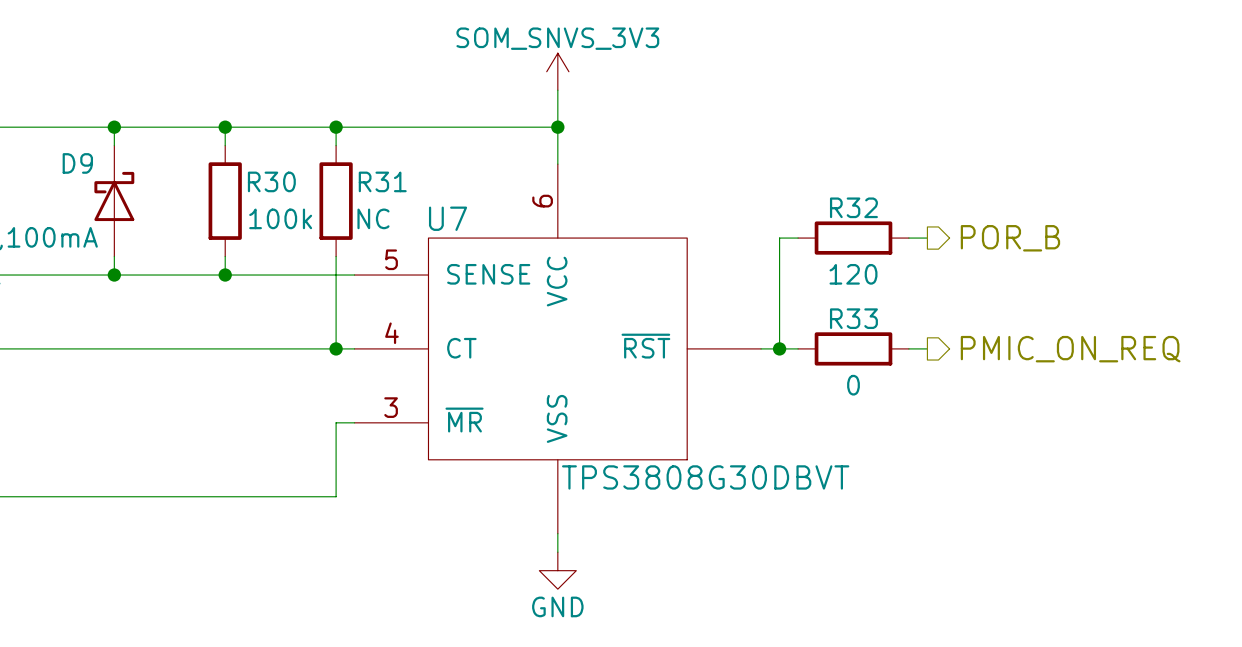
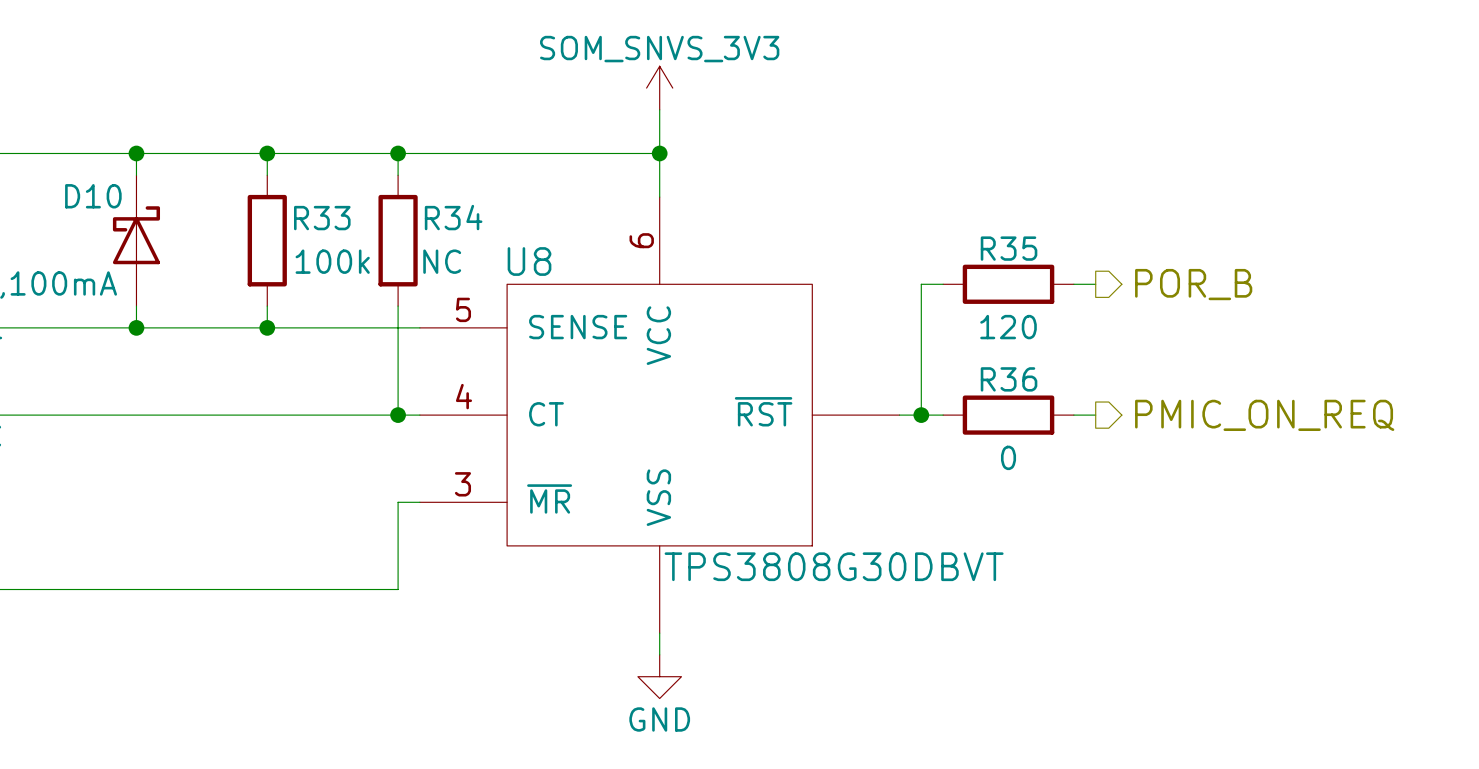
D9 name: D9 (77, 163) -> D10 (93, 196)
R30 name: R30 (271, 181) -> R33 (322, 218)
R31 name: R31 (382, 181) -> R34 (453, 217)
R32 name: R32 (853, 207) -> R35 (1009, 248)
U7 name: U7 (448, 218) -> U8 (529, 261)
R33 name: R33 (853, 318) -> R36 (1009, 379)

